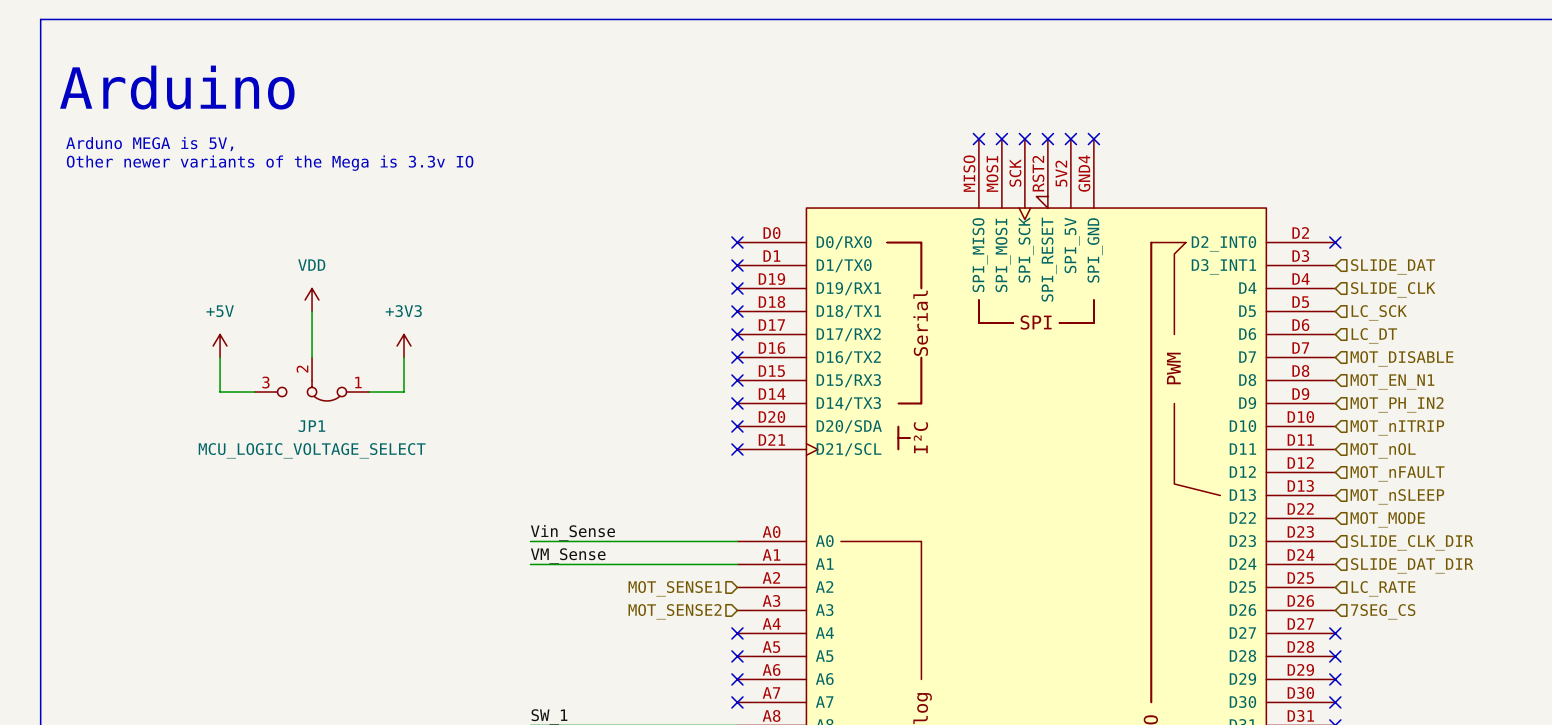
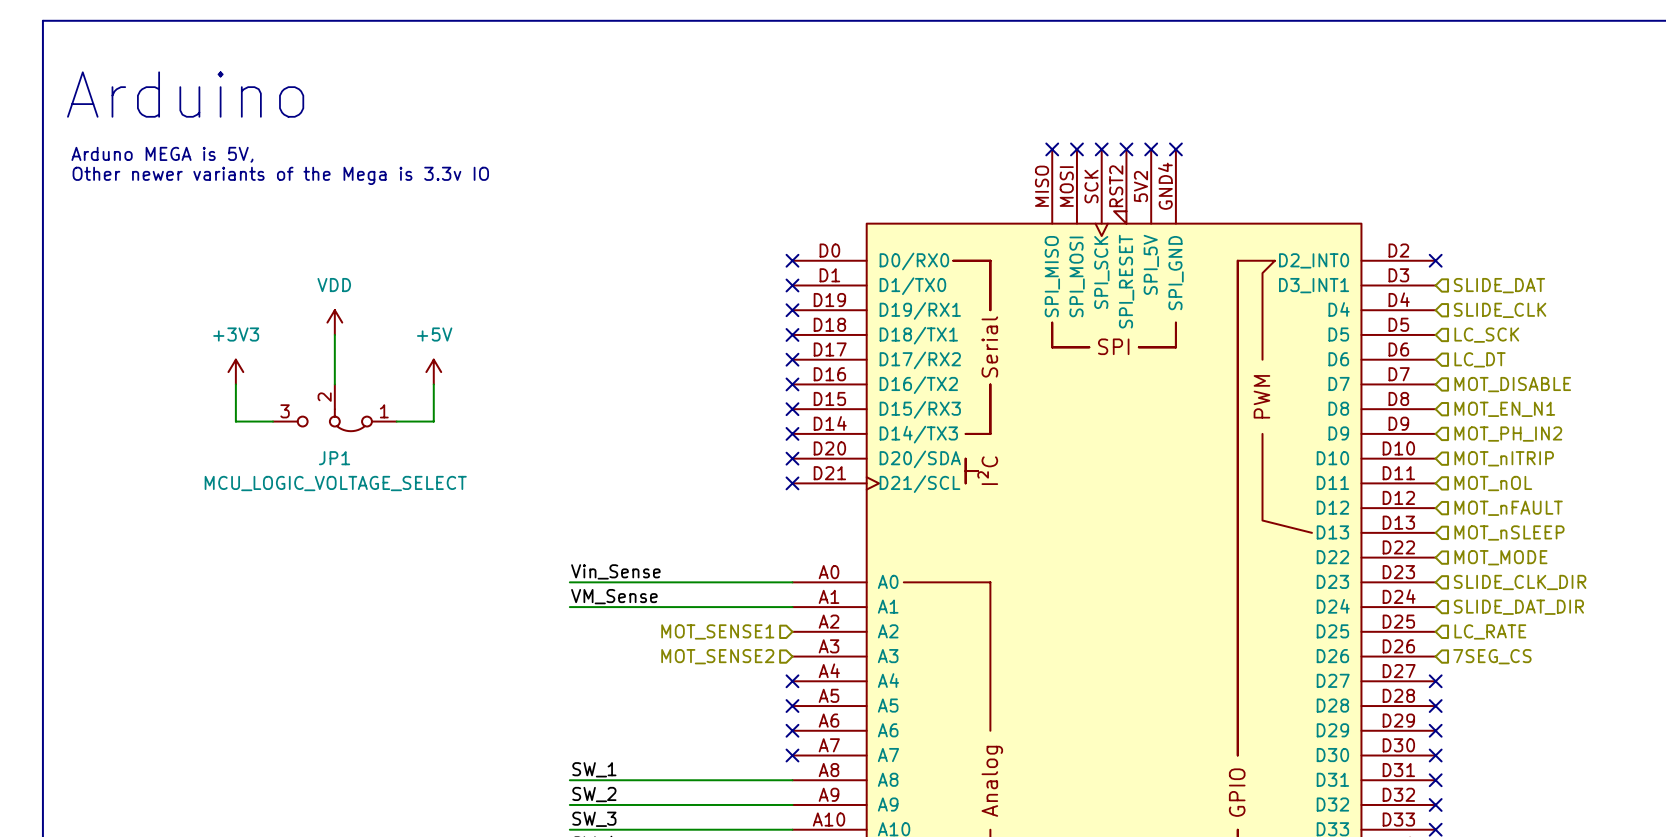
power symbol: +5V (220, 346) -> +3V3 (235, 372)
power symbol: +3V3 (404, 346) -> +5V (433, 372)

